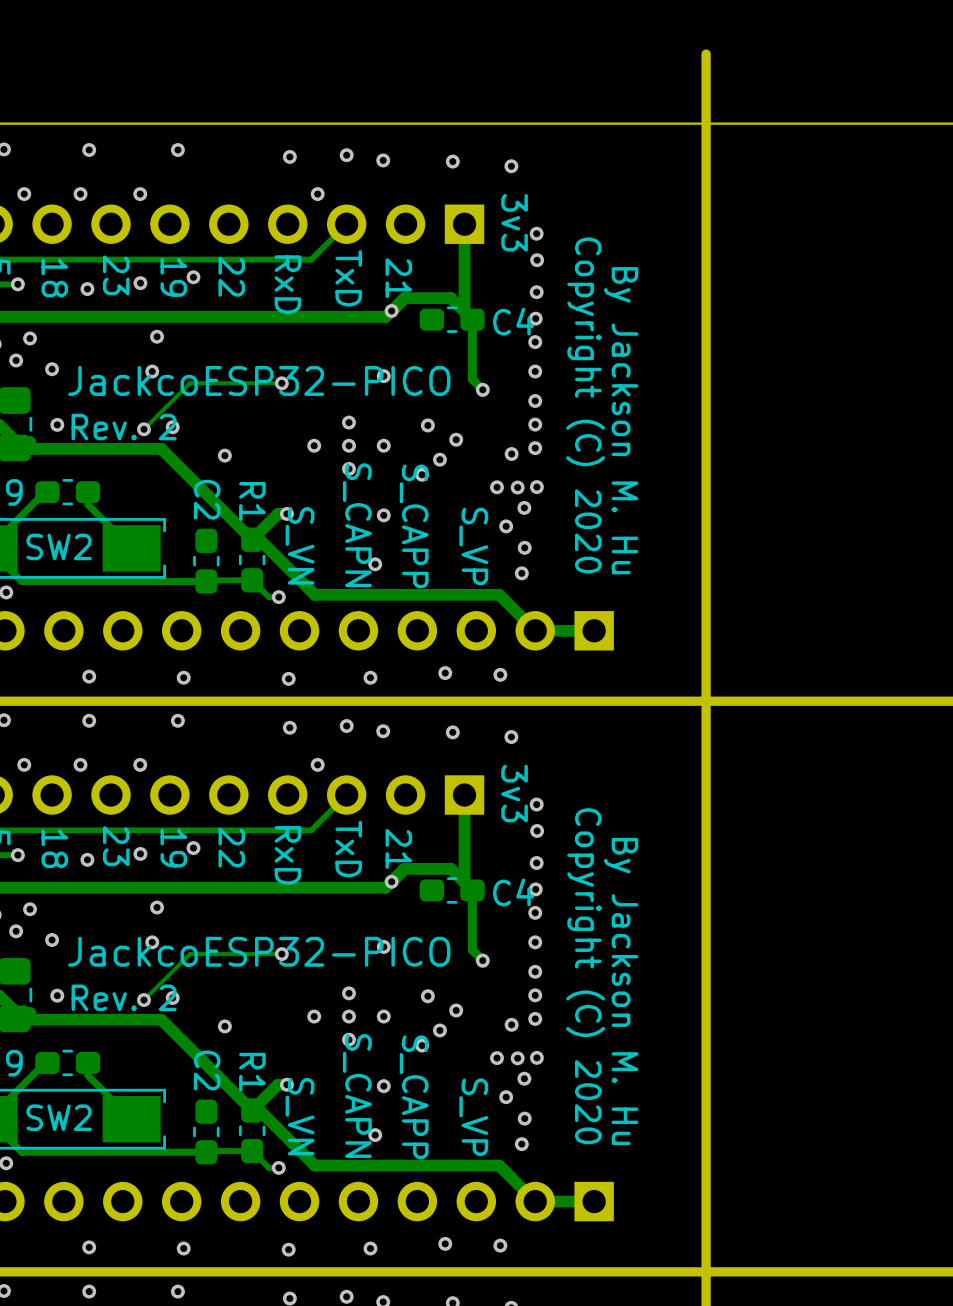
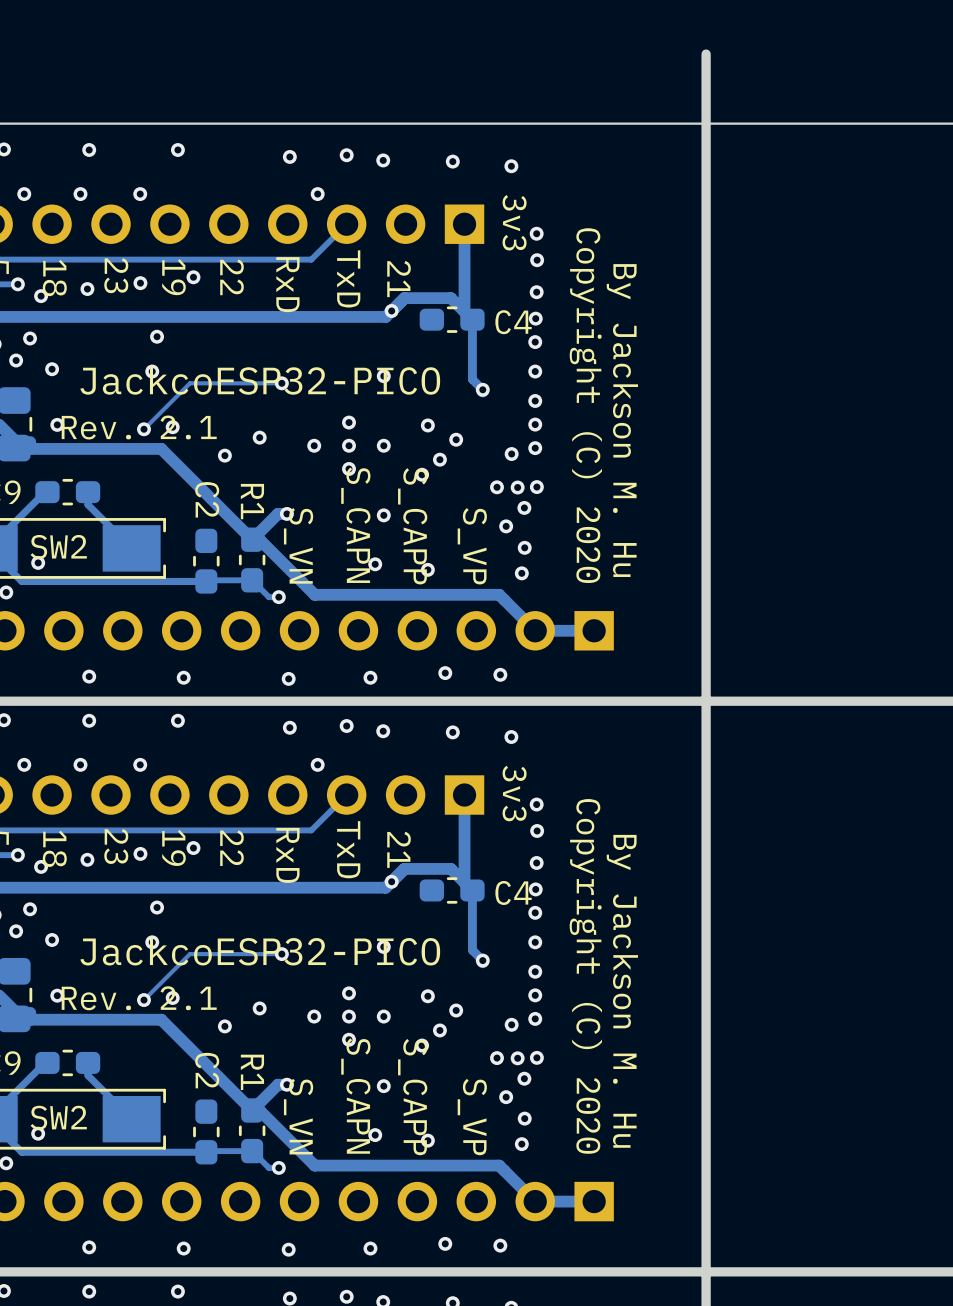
via: none -> (41, 296)
text: Rev. 2 (124, 427) -> Rev. 2.1 (139, 427)
via: none -> (259, 437)
via: none -> (38, 562)
via: none -> (427, 569)
via: none -> (41, 866)
text: Rev. 2 (124, 997) -> Rev. 2.1 (139, 998)
via: none -> (259, 1008)
via: none -> (38, 1133)
via: none -> (427, 1140)

